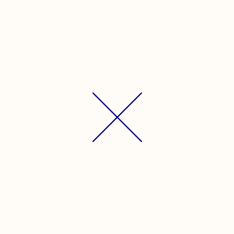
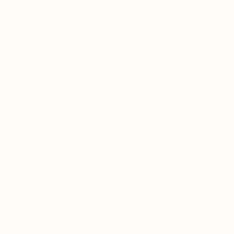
no-connect mark: (117, 117) -> none

